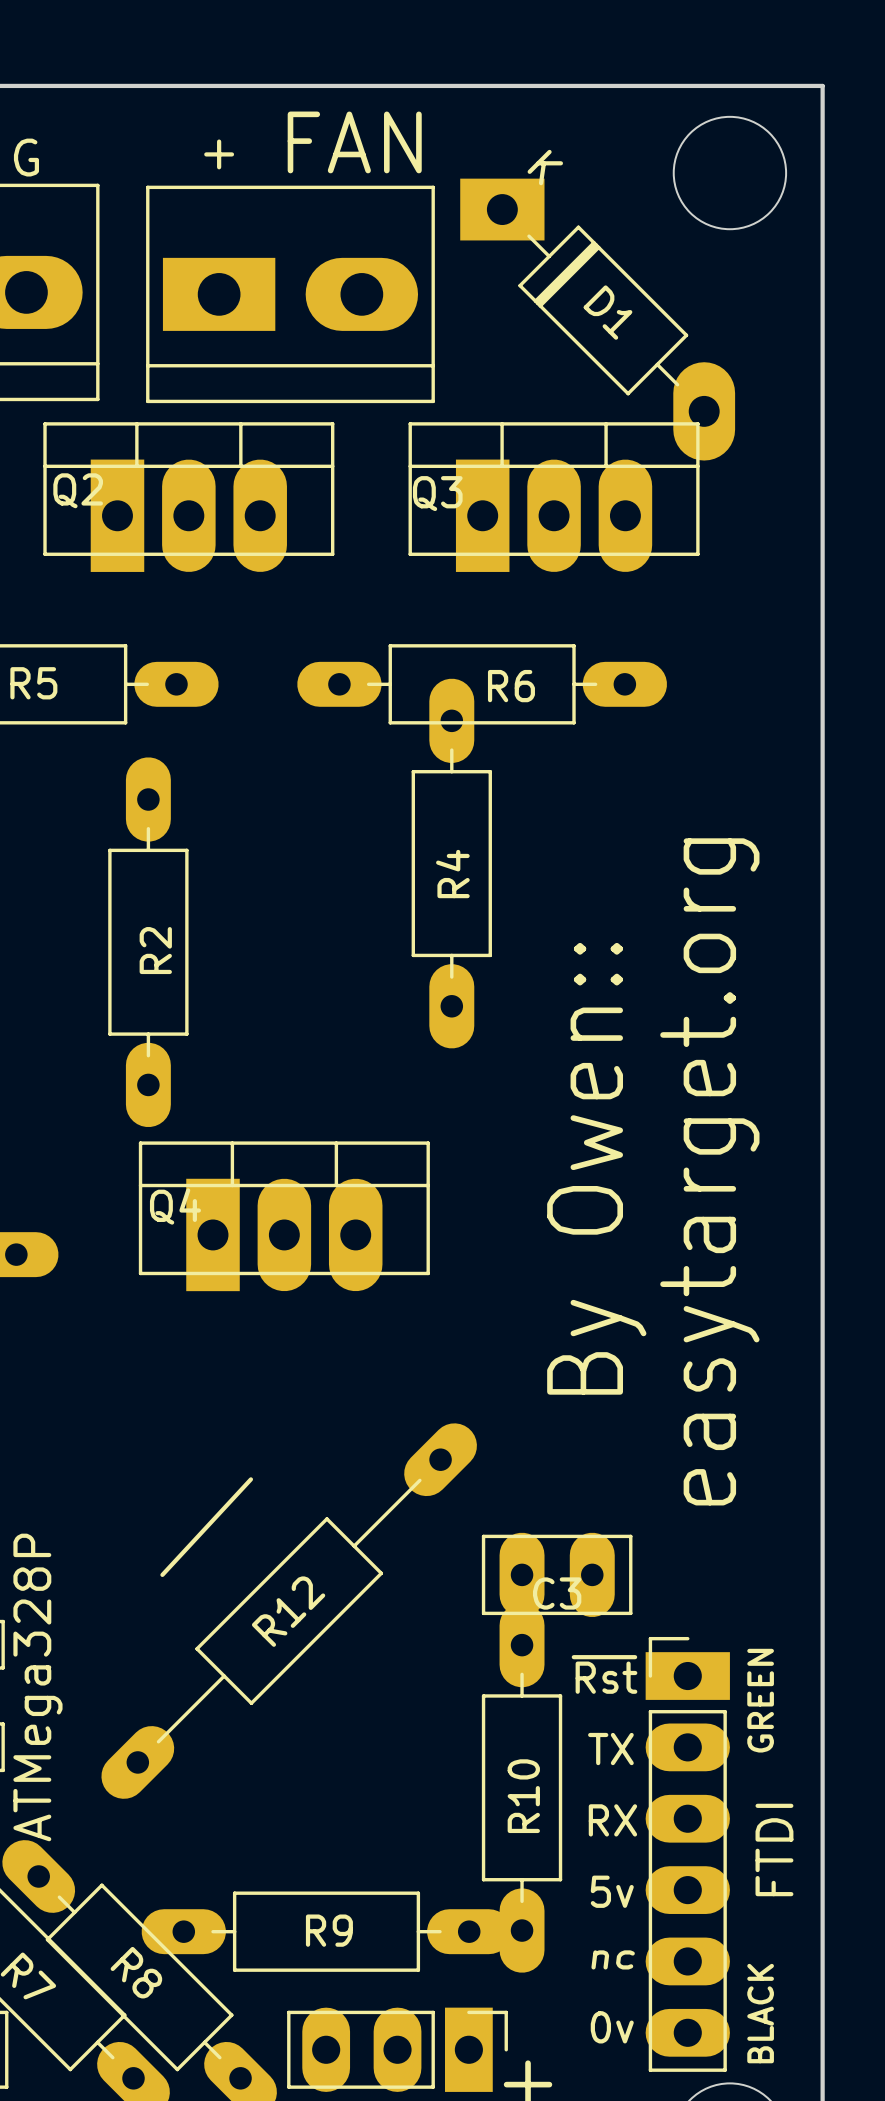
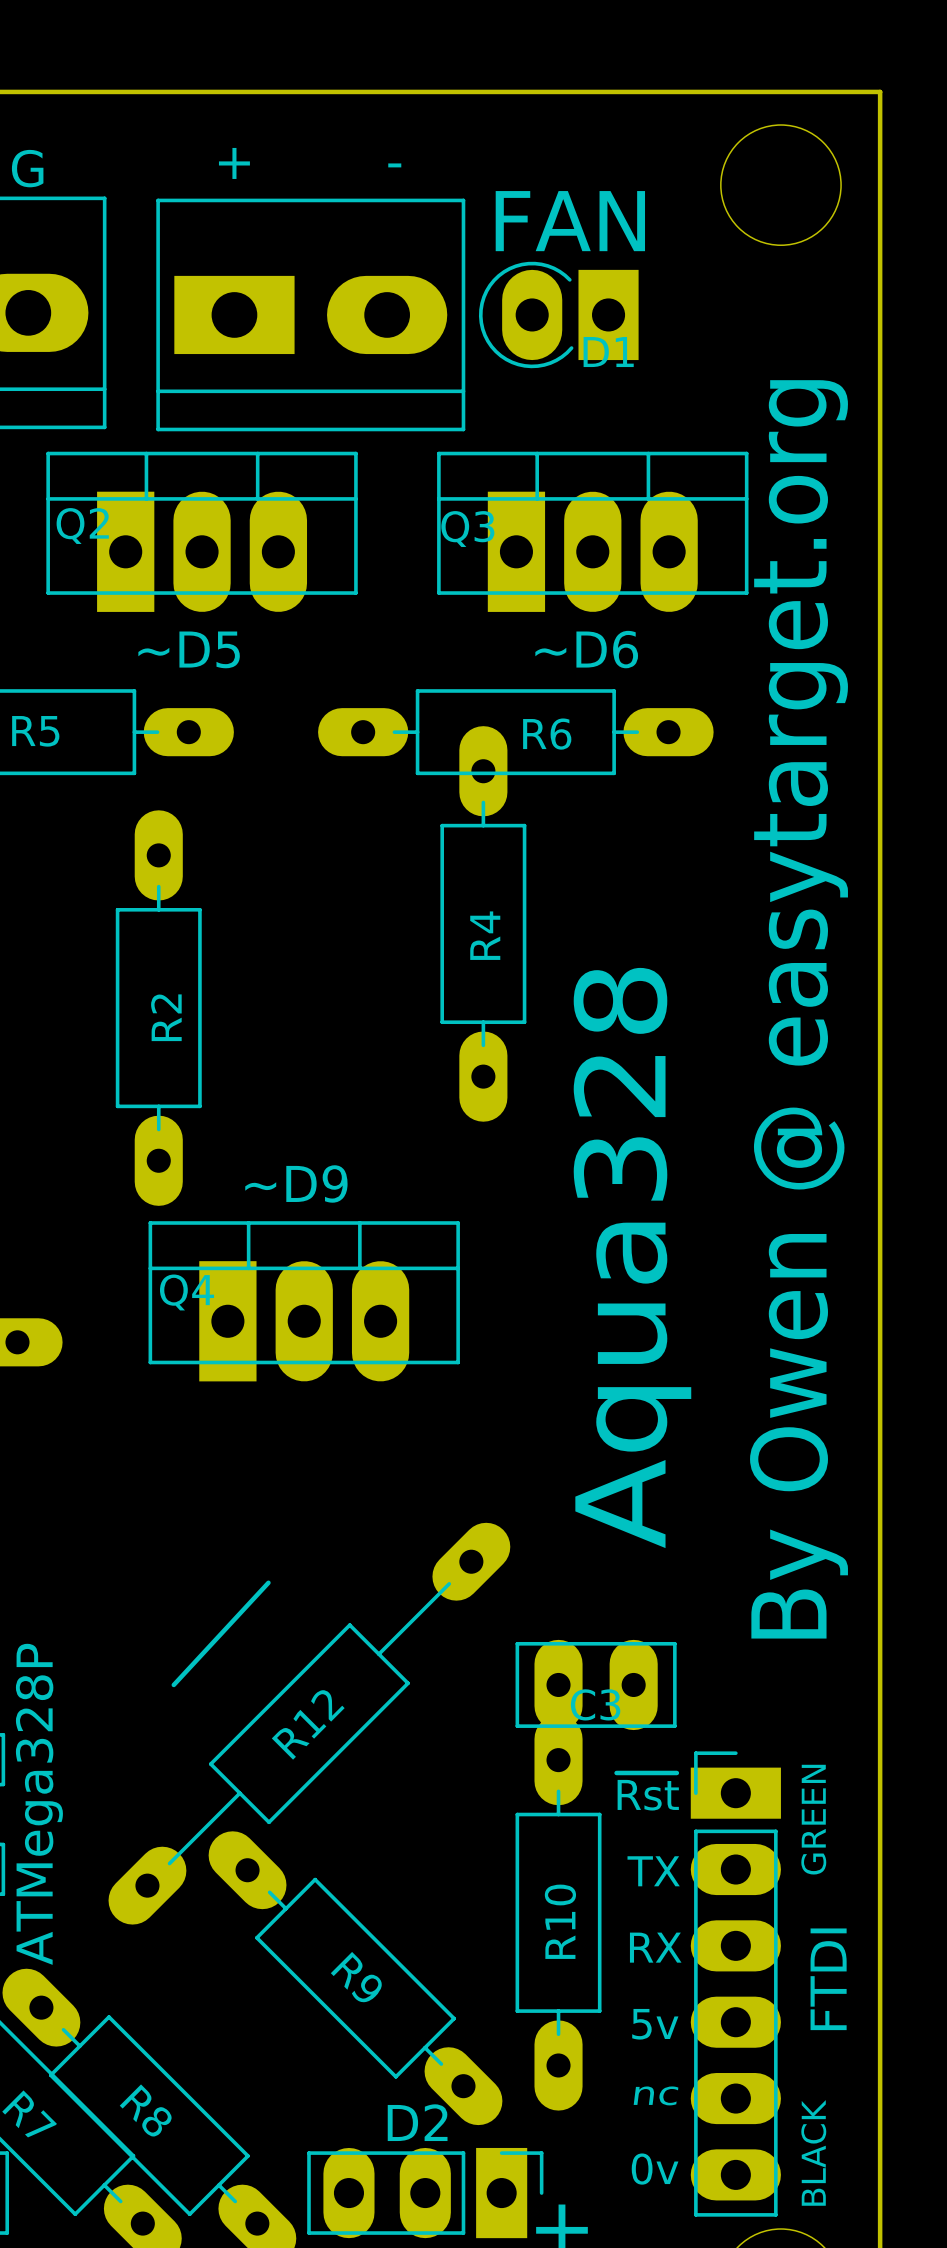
part text position: FAN (354, 142) -> FAN (570, 221)
part text: none -> - (394, 165)
D1 footprint: [460, 178, 736, 461] -> [478, 261, 639, 369]
text: none -> ~D5 (189, 649)
text: none -> ~D6 (586, 649)
text: none -> ~D9 (296, 1183)
text: By Owen:: (596, 1168) -> Aqua328 (632, 1258)
text: easytarget.org (709, 1171) -> By Owen @ easytarget.org (799, 1009)
R9 rotation: 0° (326, 1931) -> 45° clockwise (355, 1978)
text: none -> D2 (417, 2122)

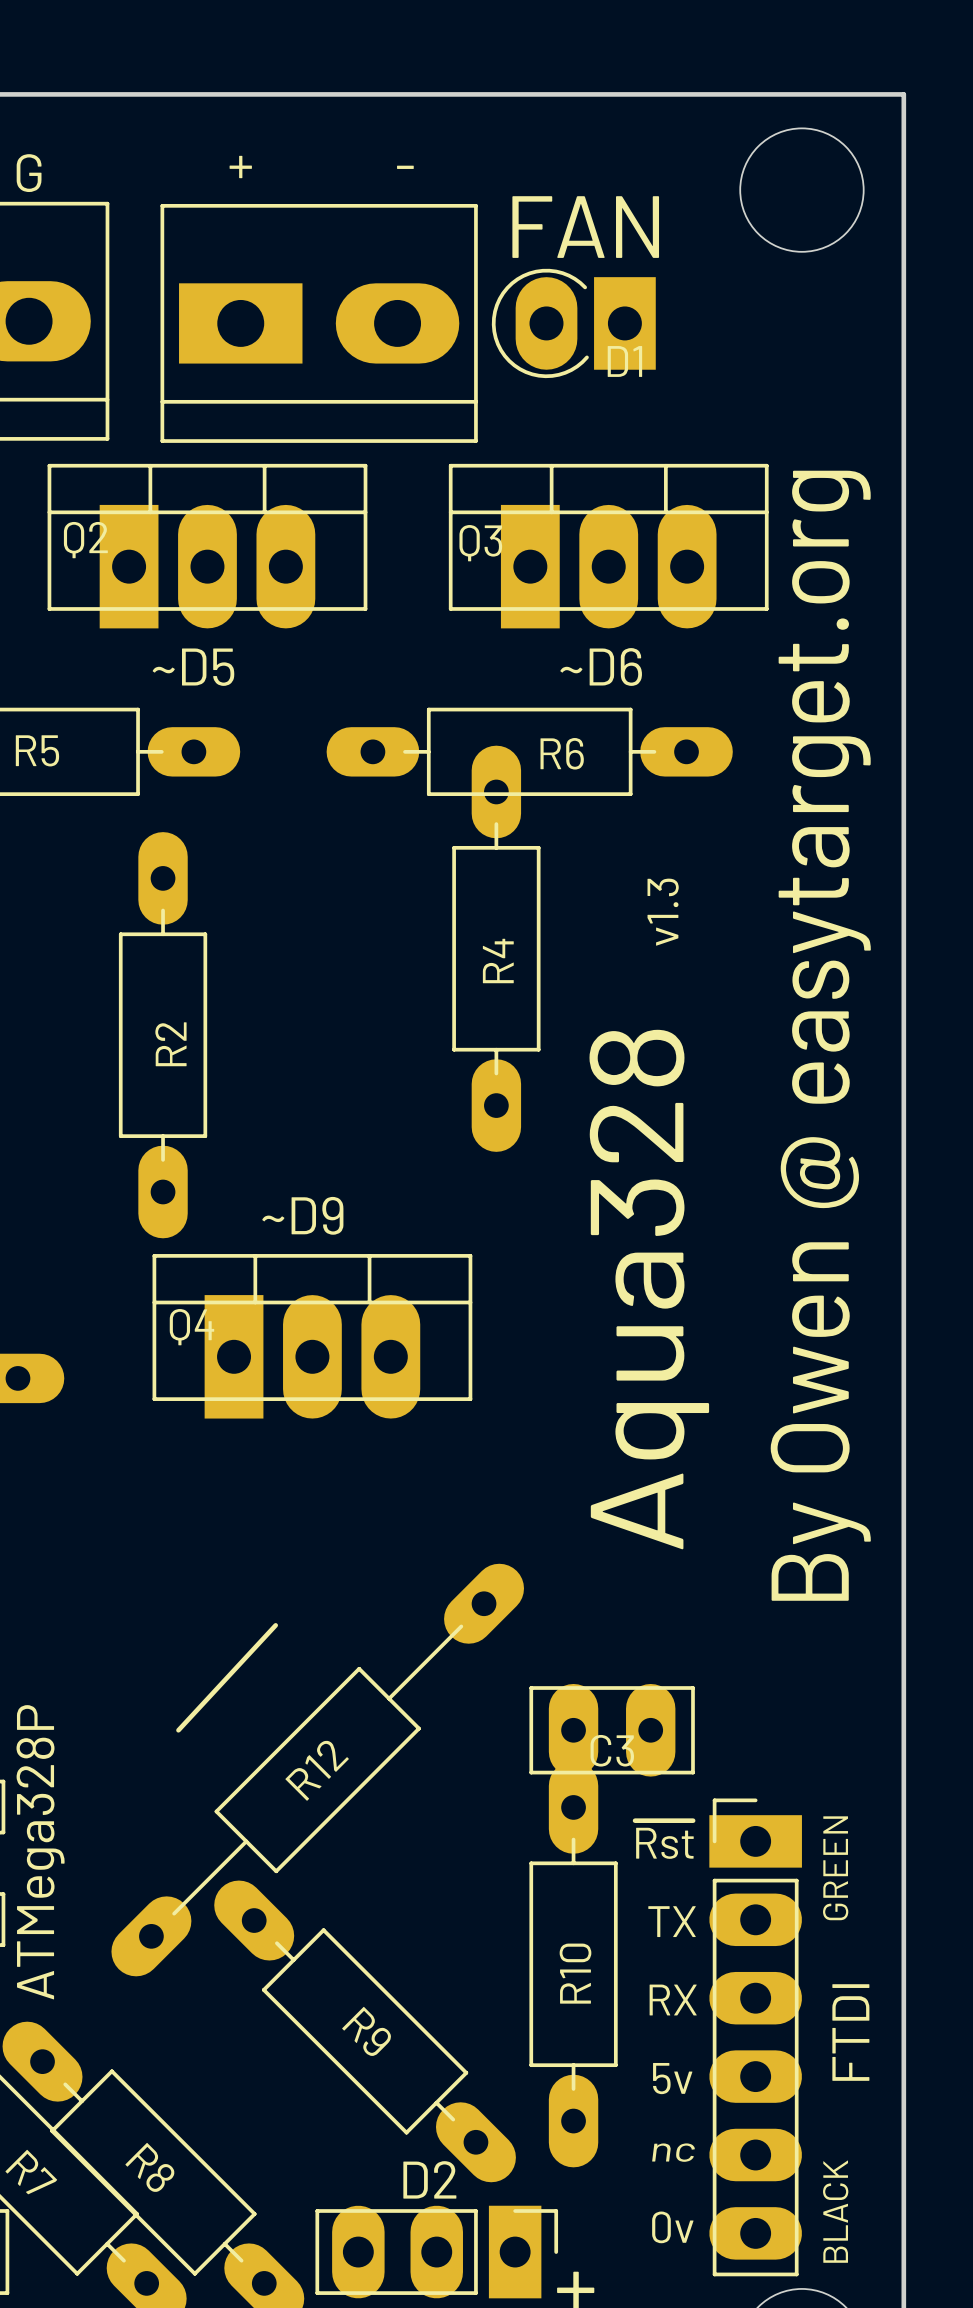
text: none -> v1.3 (663, 912)

